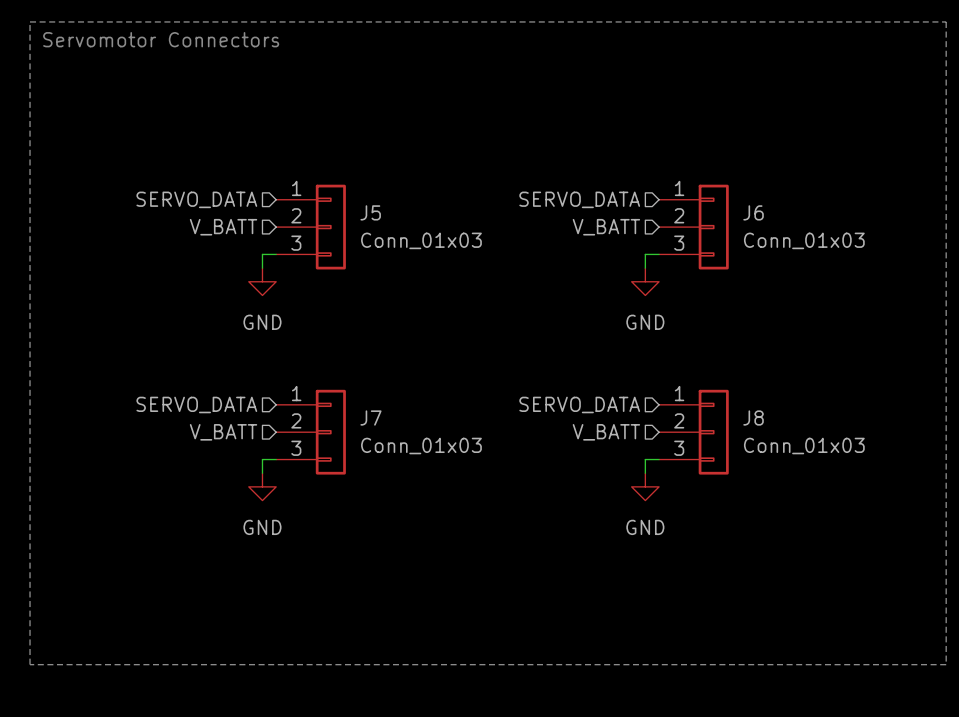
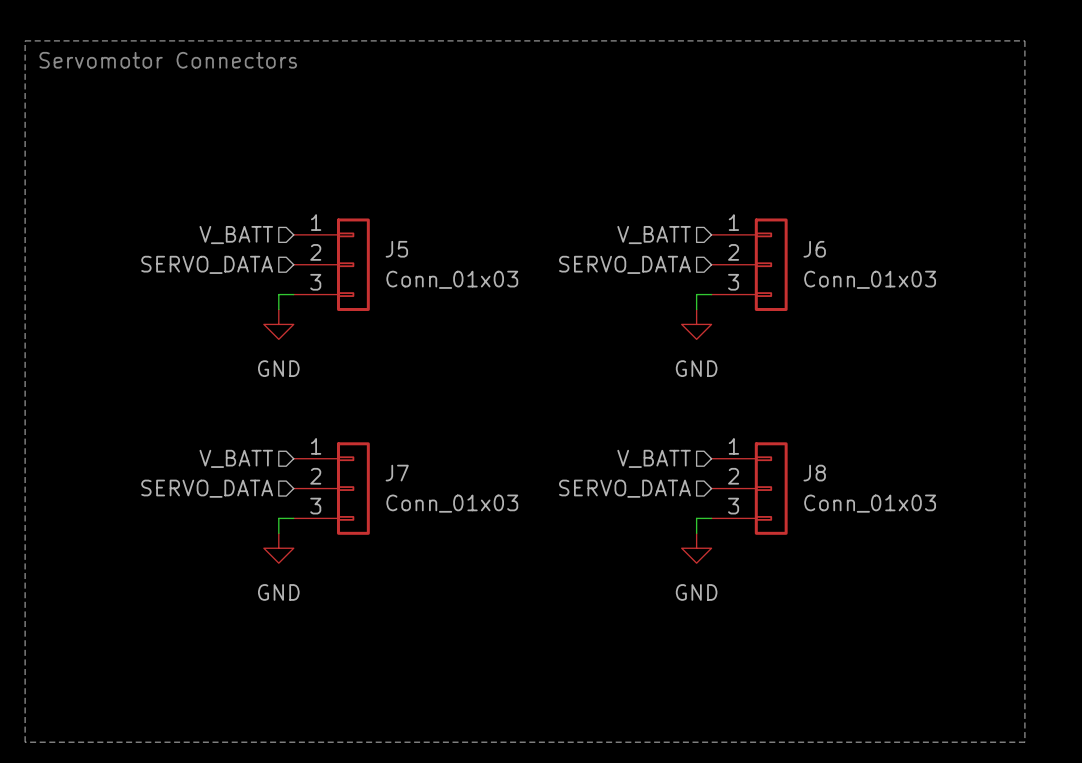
hierarchical label: SERVO_DATA (196, 199) -> V_BATT (236, 235)
hierarchical label: SERVO_DATA (579, 199) -> V_BATT (654, 235)
hierarchical label: V_BATT (223, 227) -> SERVO_DATA (207, 264)
hierarchical label: V_BATT (606, 227) -> SERVO_DATA (624, 264)
hierarchical label: SERVO_DATA (196, 404) -> V_BATT (236, 458)
hierarchical label: SERVO_DATA (579, 404) -> V_BATT (654, 458)
hierarchical label: V_BATT (223, 432) -> SERVO_DATA (207, 488)
hierarchical label: V_BATT (606, 432) -> SERVO_DATA (624, 488)

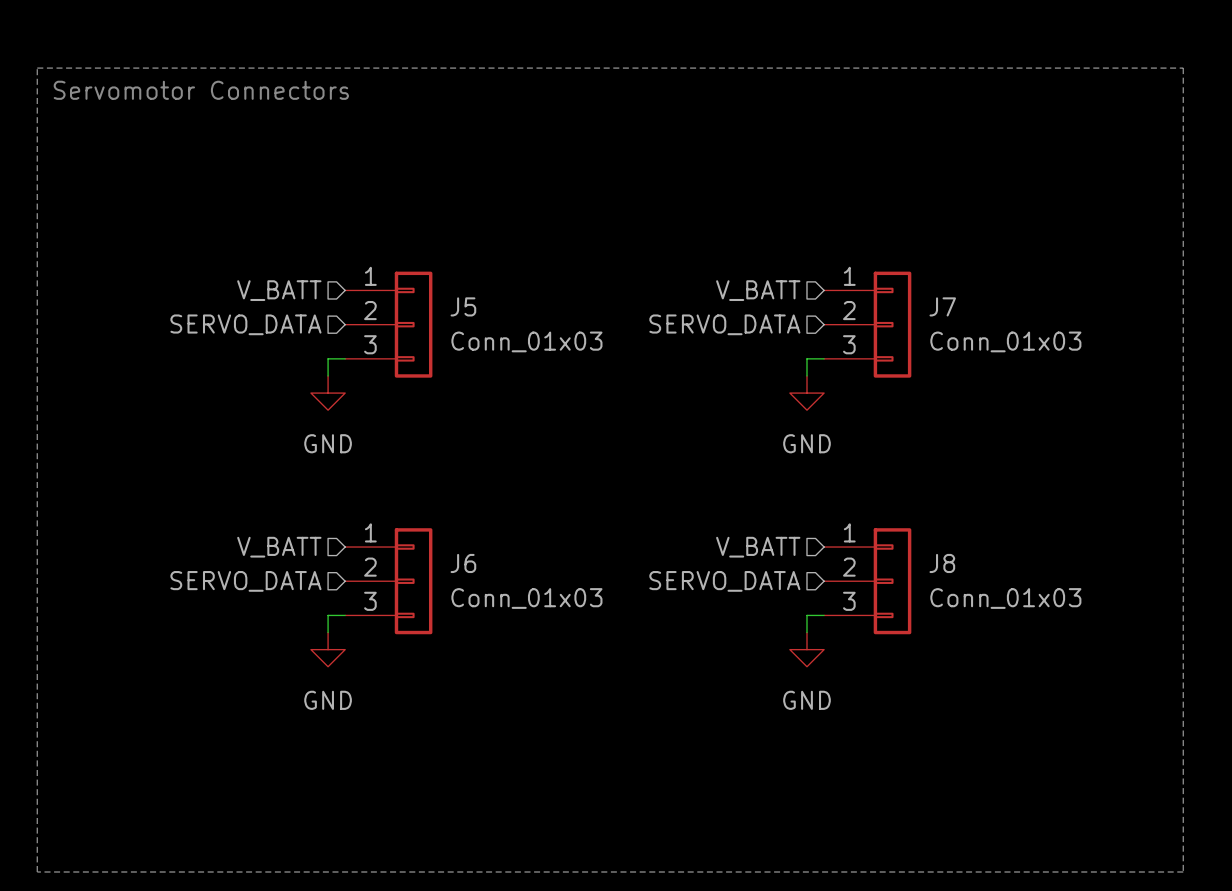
J6 name: J6 (814, 249) -> J7 (942, 306)
J7 name: J7 (397, 473) -> J6 (463, 563)

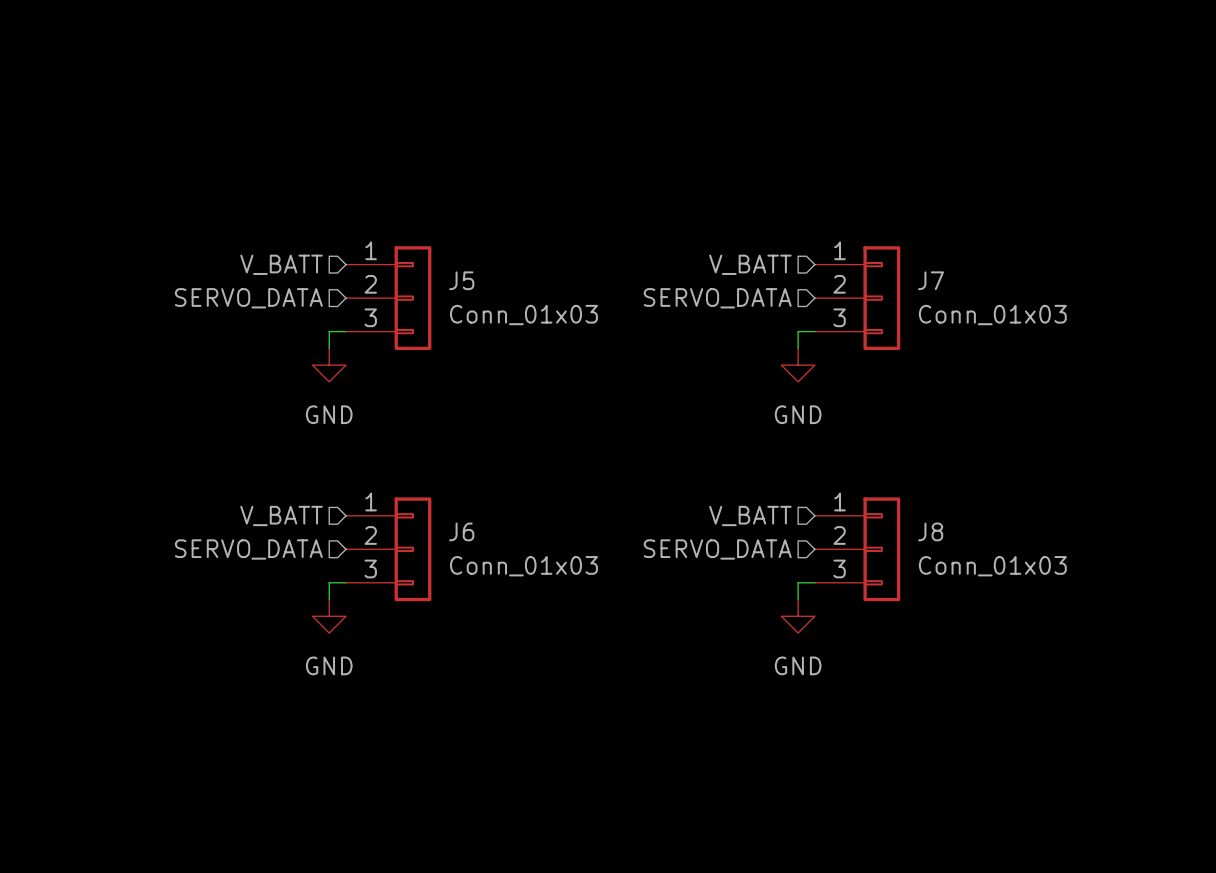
line: (37, 68) (1183, 68) (1183, 872) (37, 872) (37, 68) -> none
text: Servomotor Connectors (201, 90) -> none

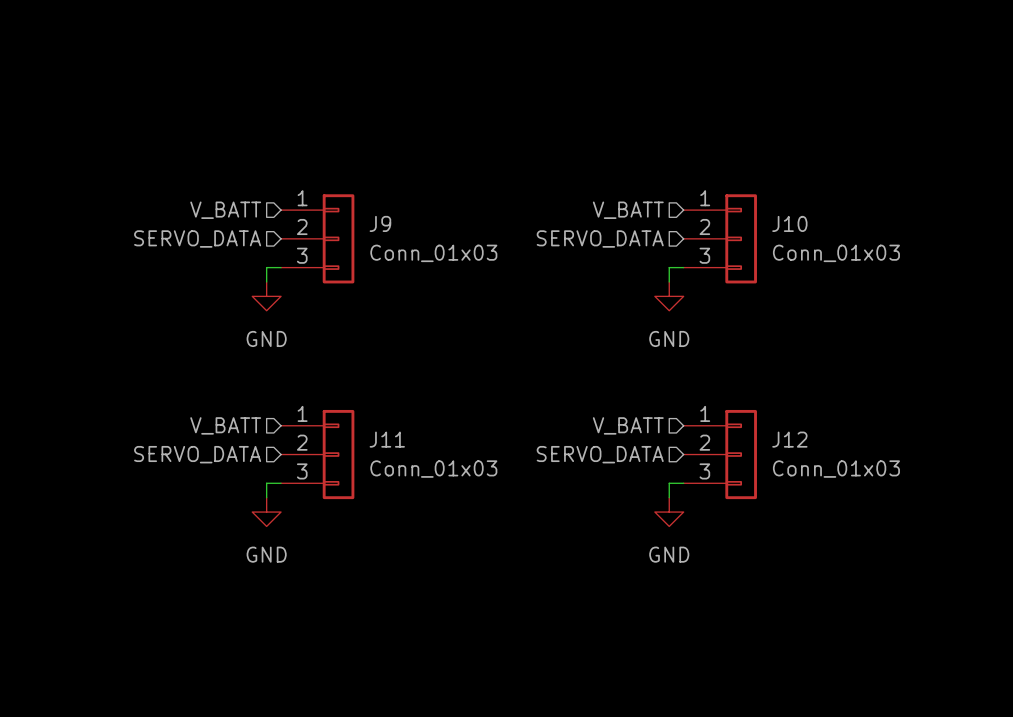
J5 name: J5 (461, 280) -> J9 (380, 223)
J7 name: J7 (931, 280) -> J10 (789, 223)
J6 name: J6 (461, 531) -> J11 (387, 439)
J8 name: J8 (930, 531) -> J12 (789, 439)

